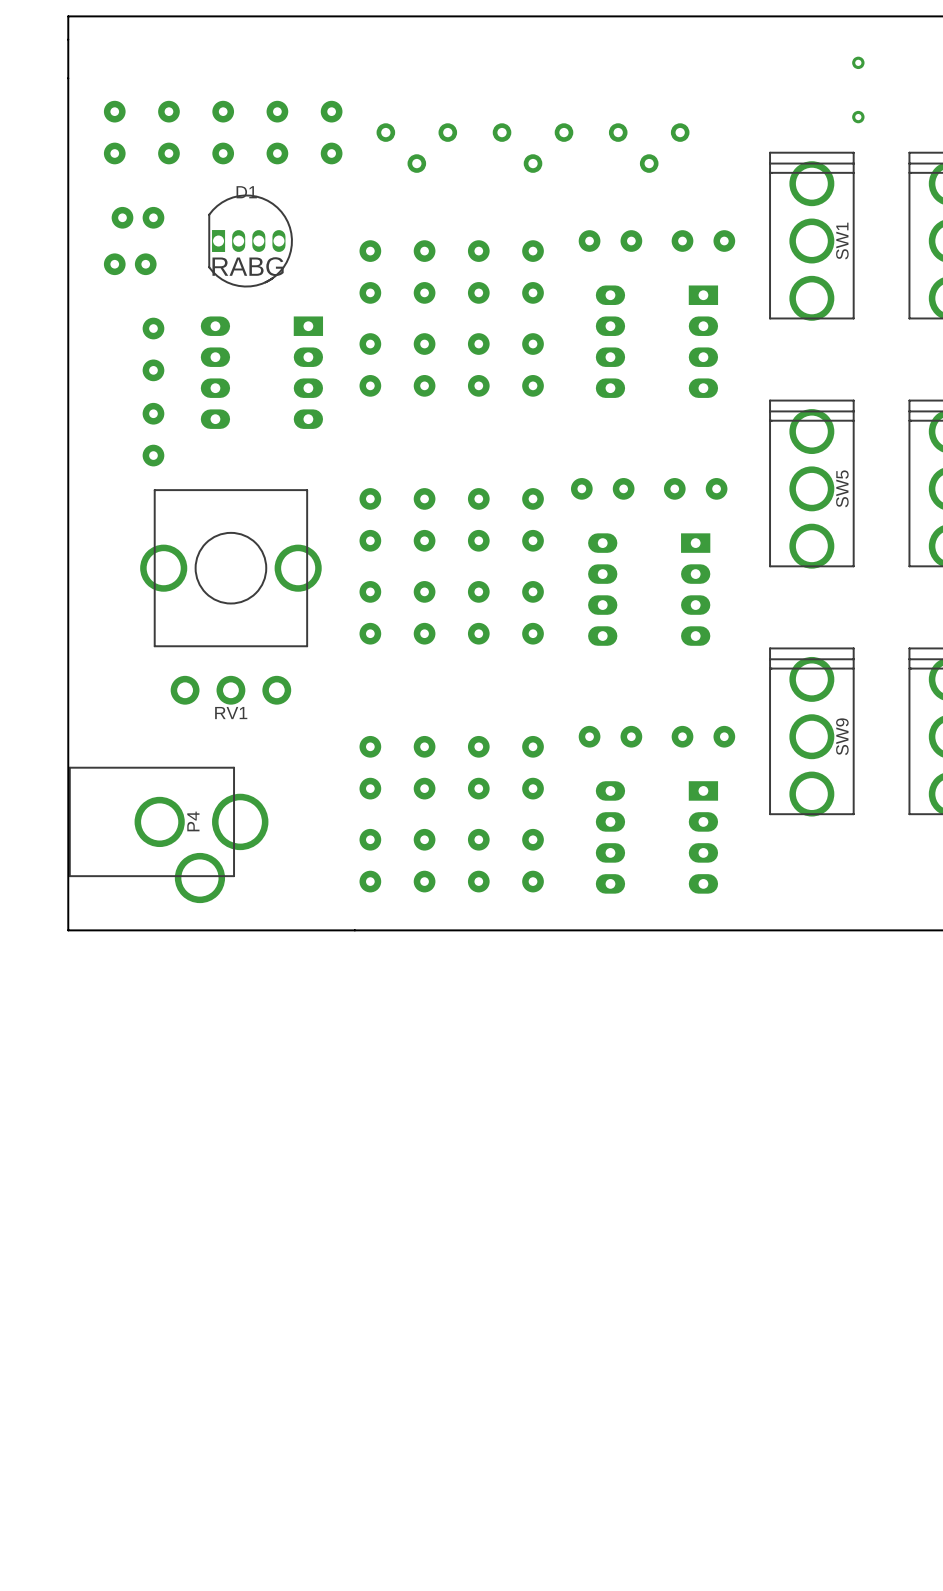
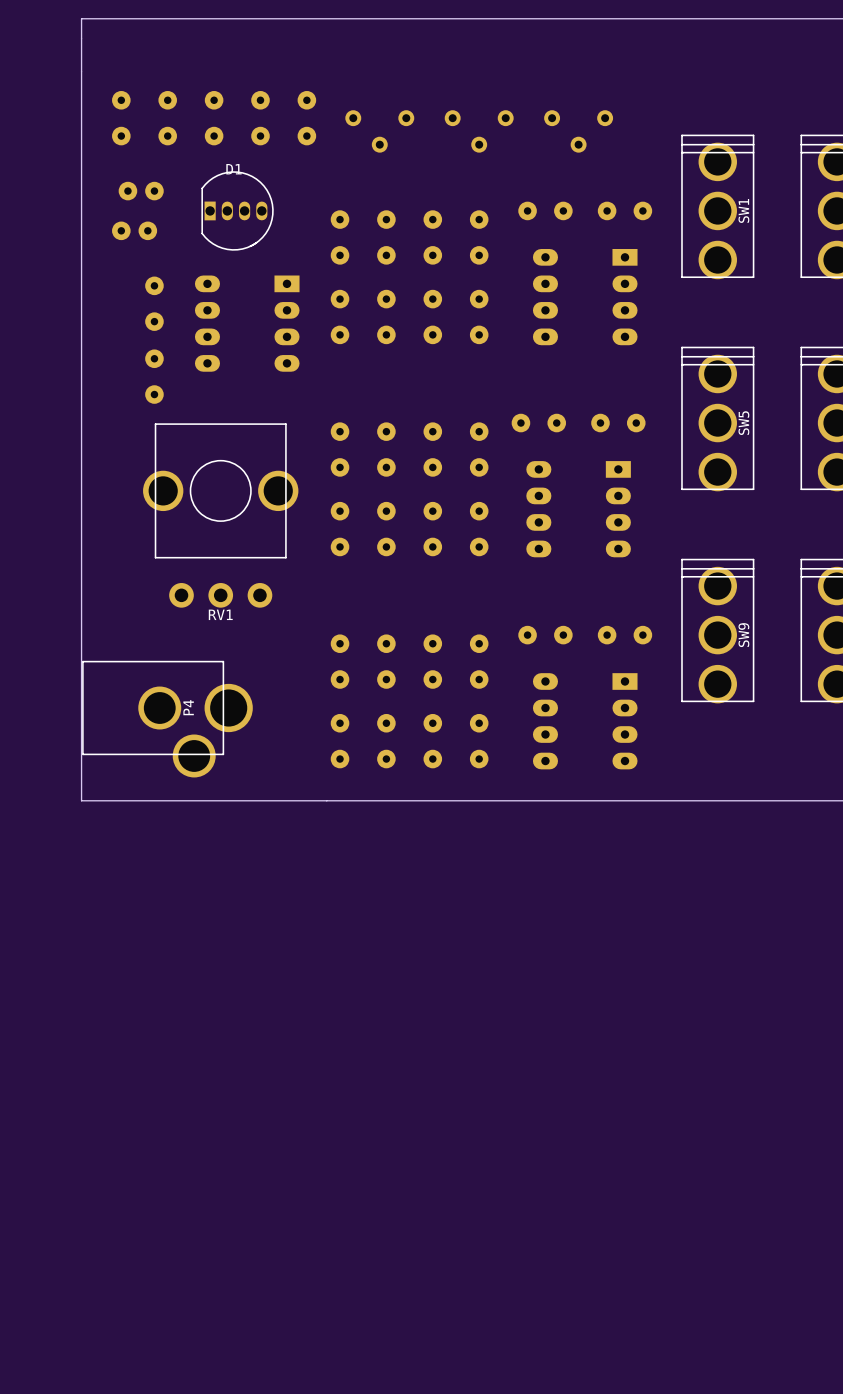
part: (858, 62) -> none
part: (858, 117) -> none
text: RABG (248, 266) -> none

